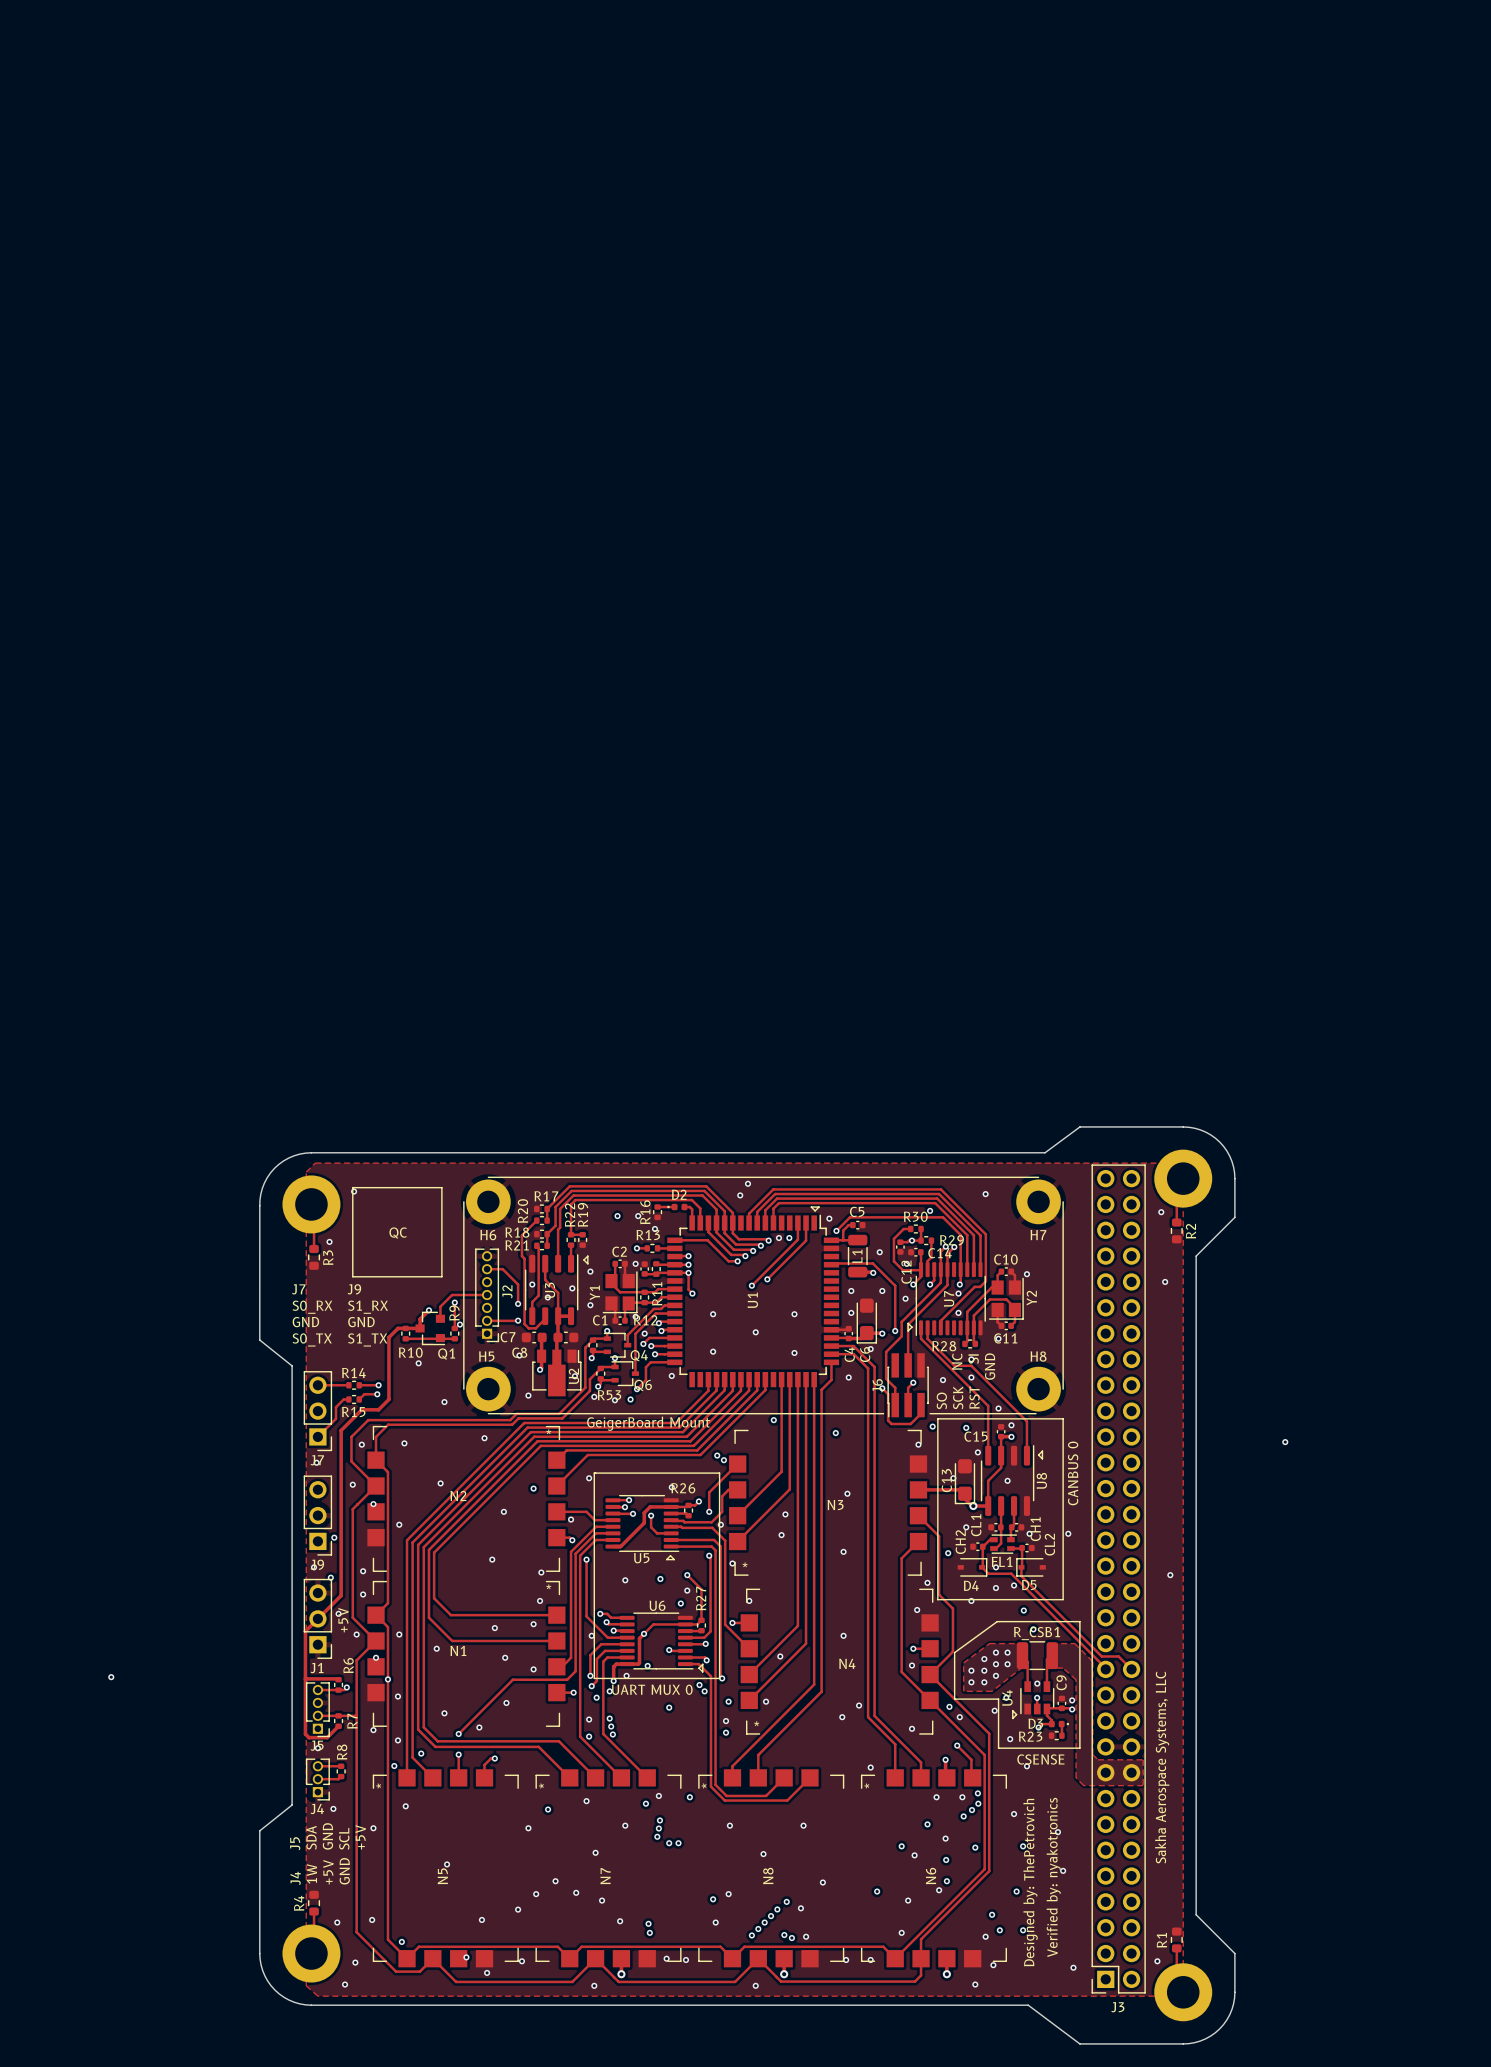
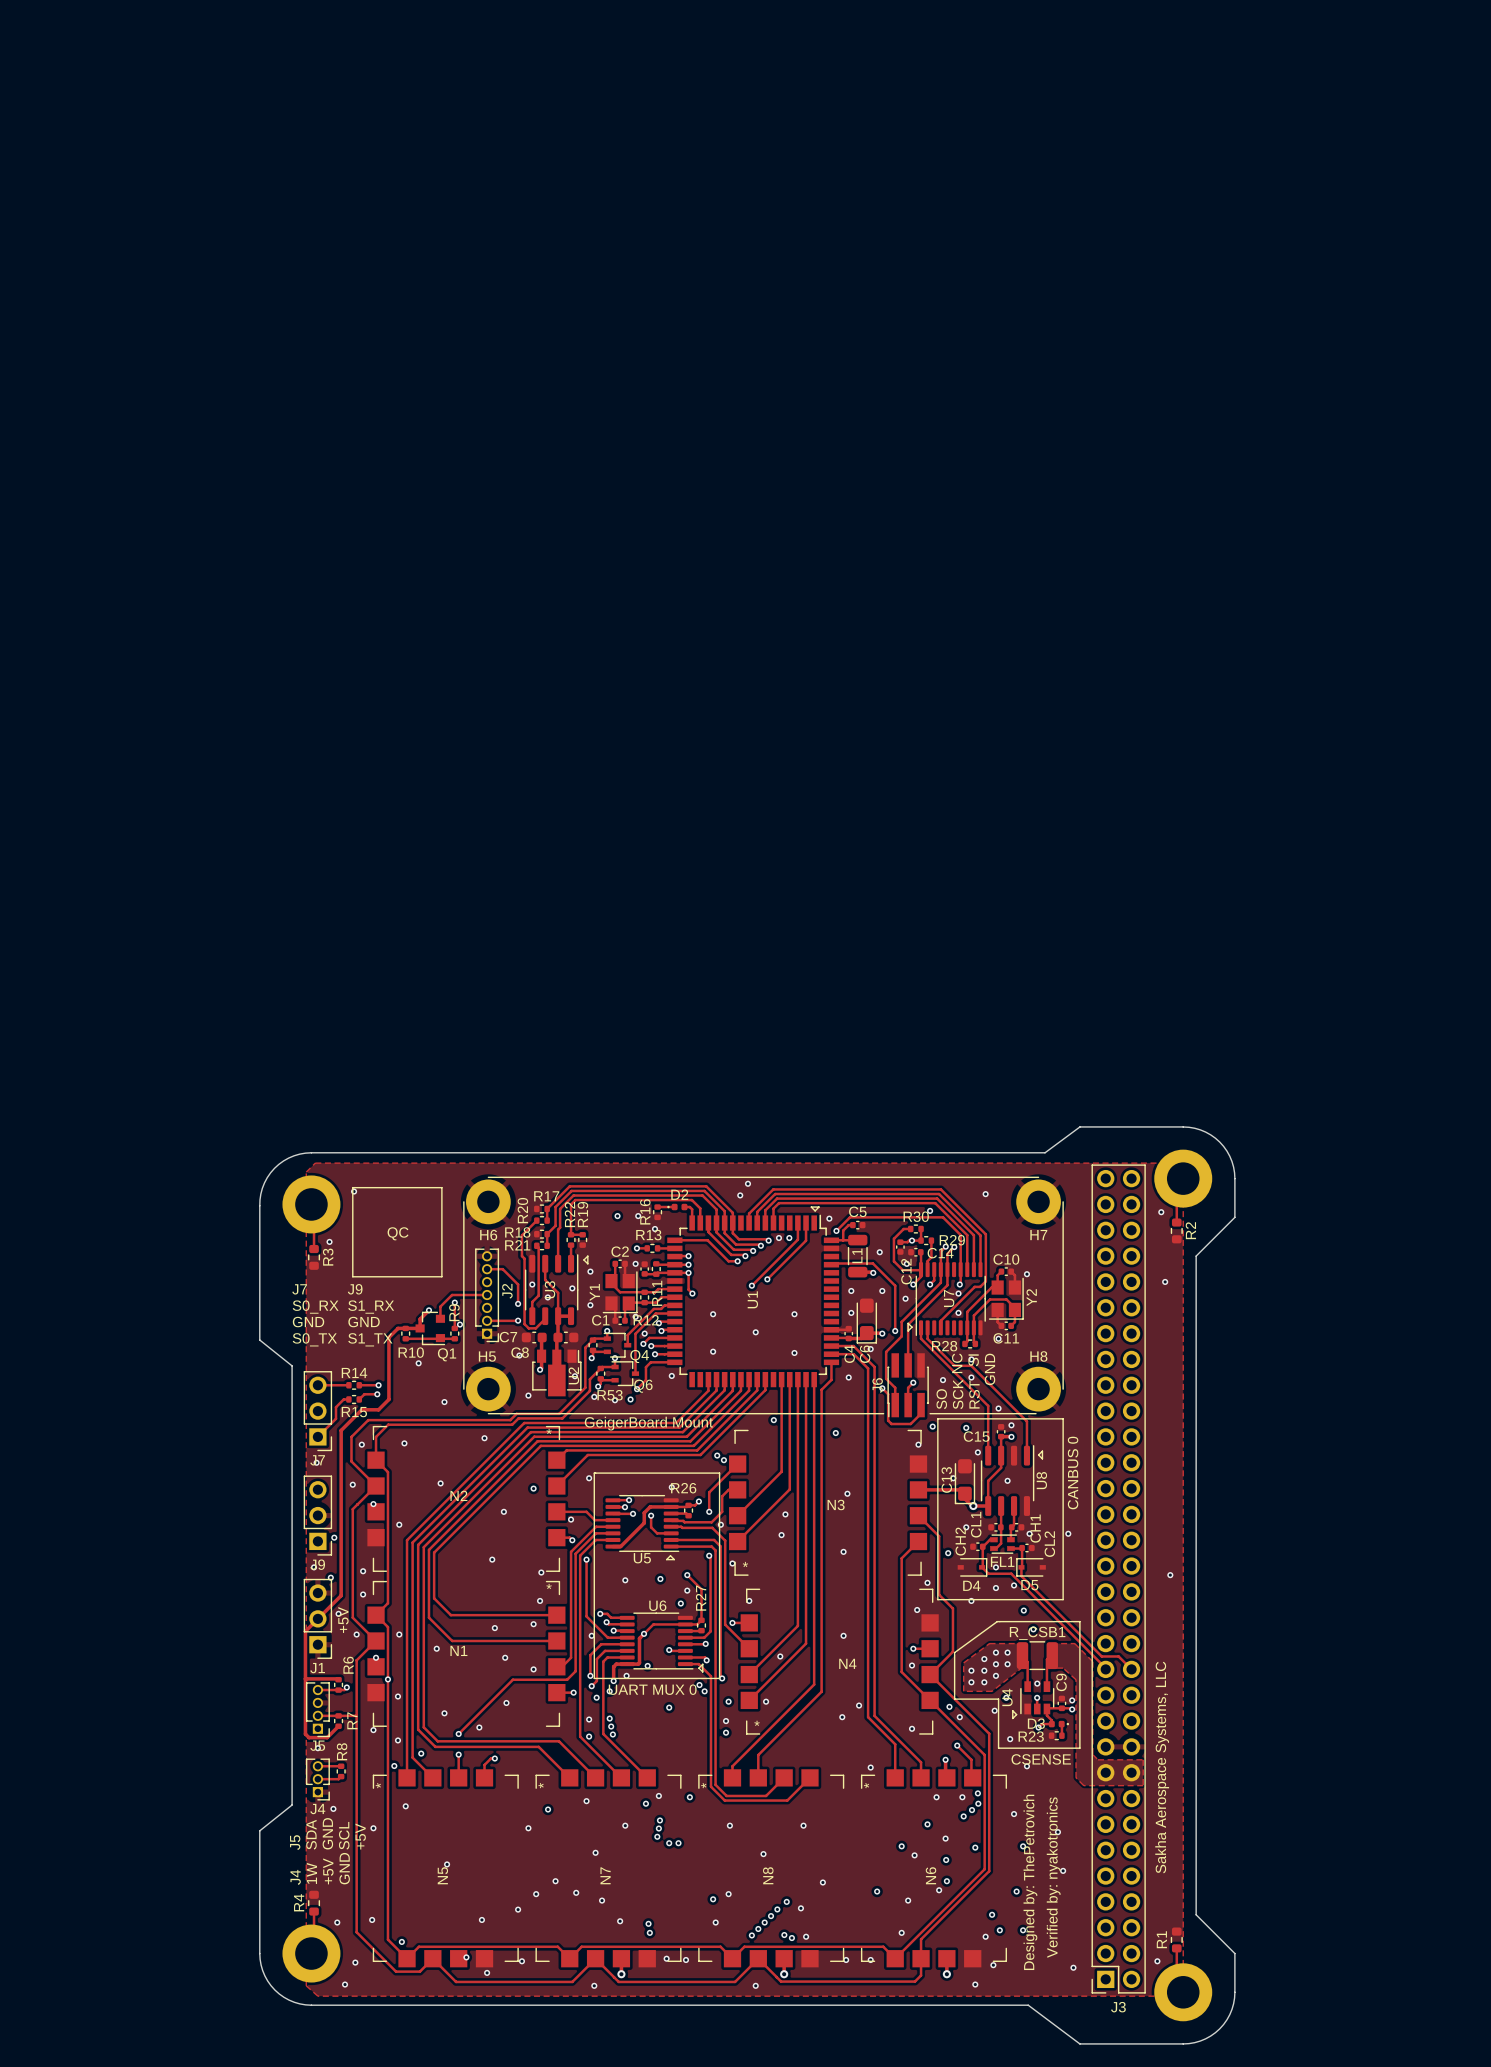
via: (1285, 1442) -> none
via: (111, 1677) -> none

